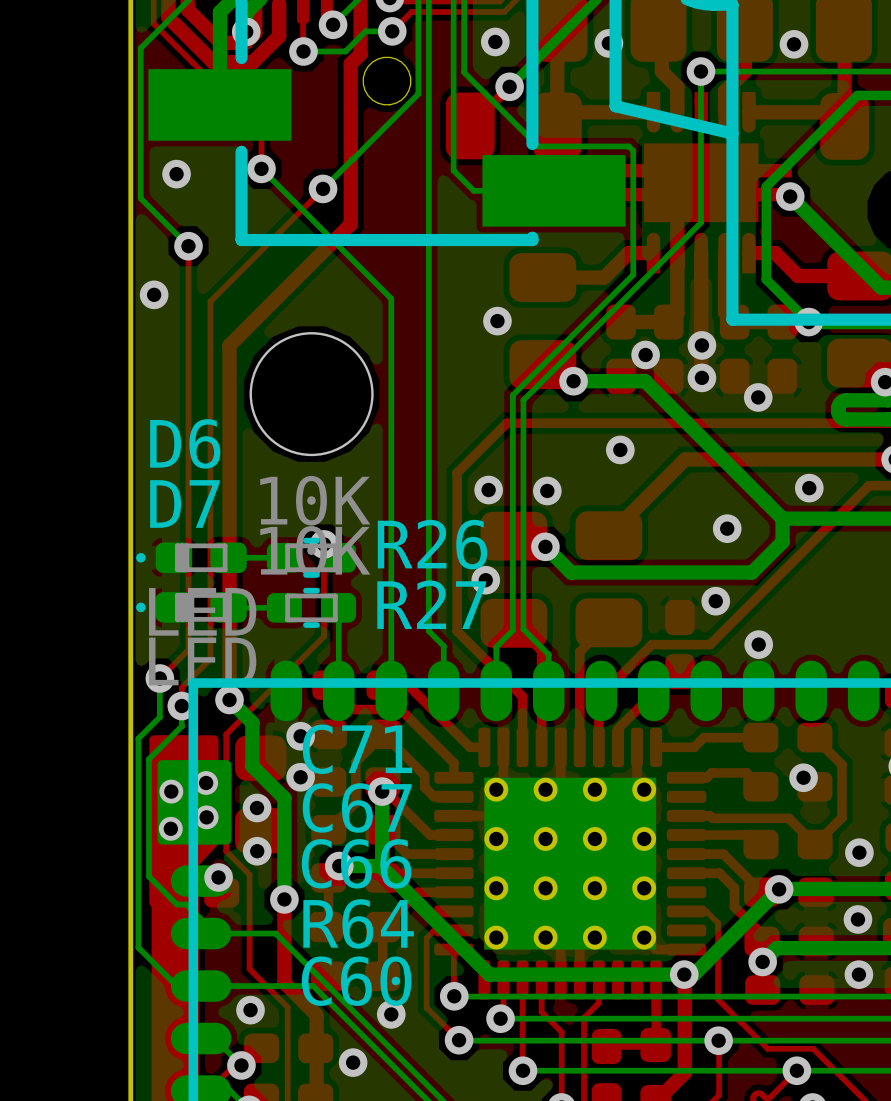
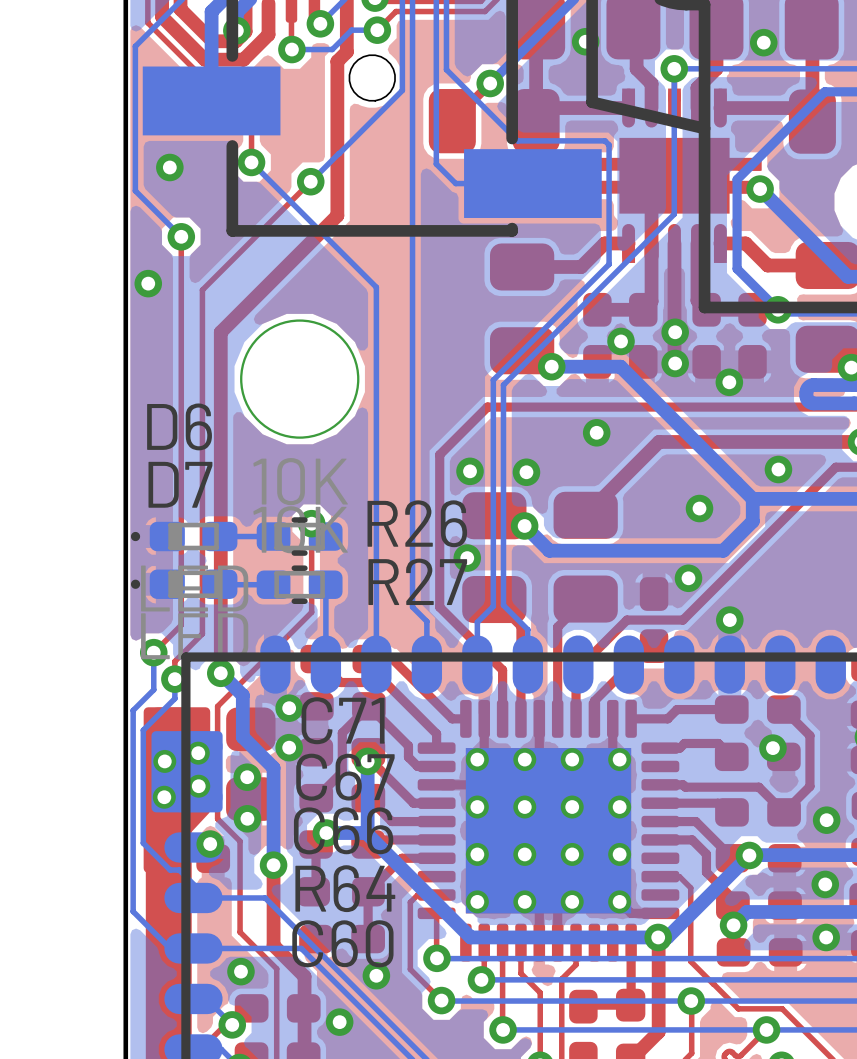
via: (495, 41) -> none
via: (497, 321) -> none

